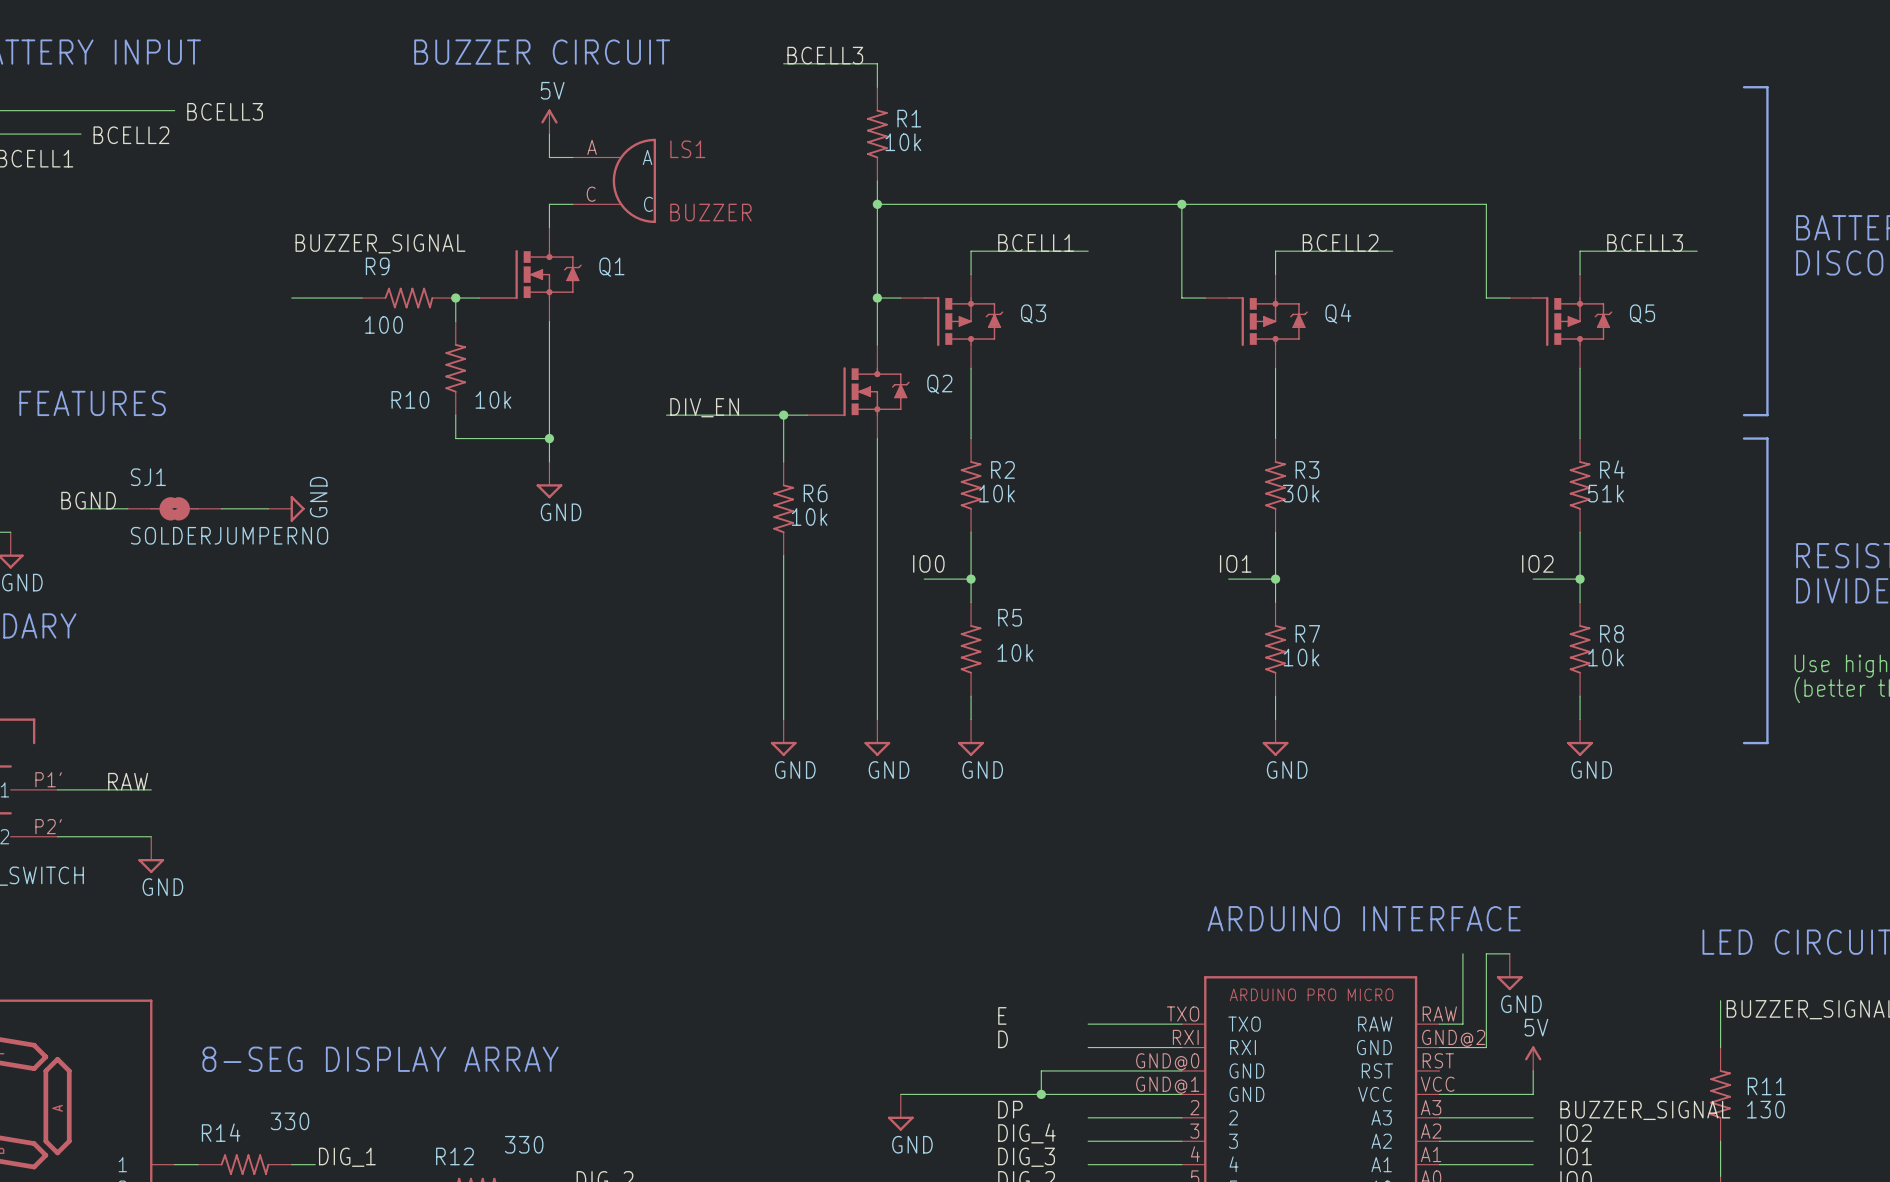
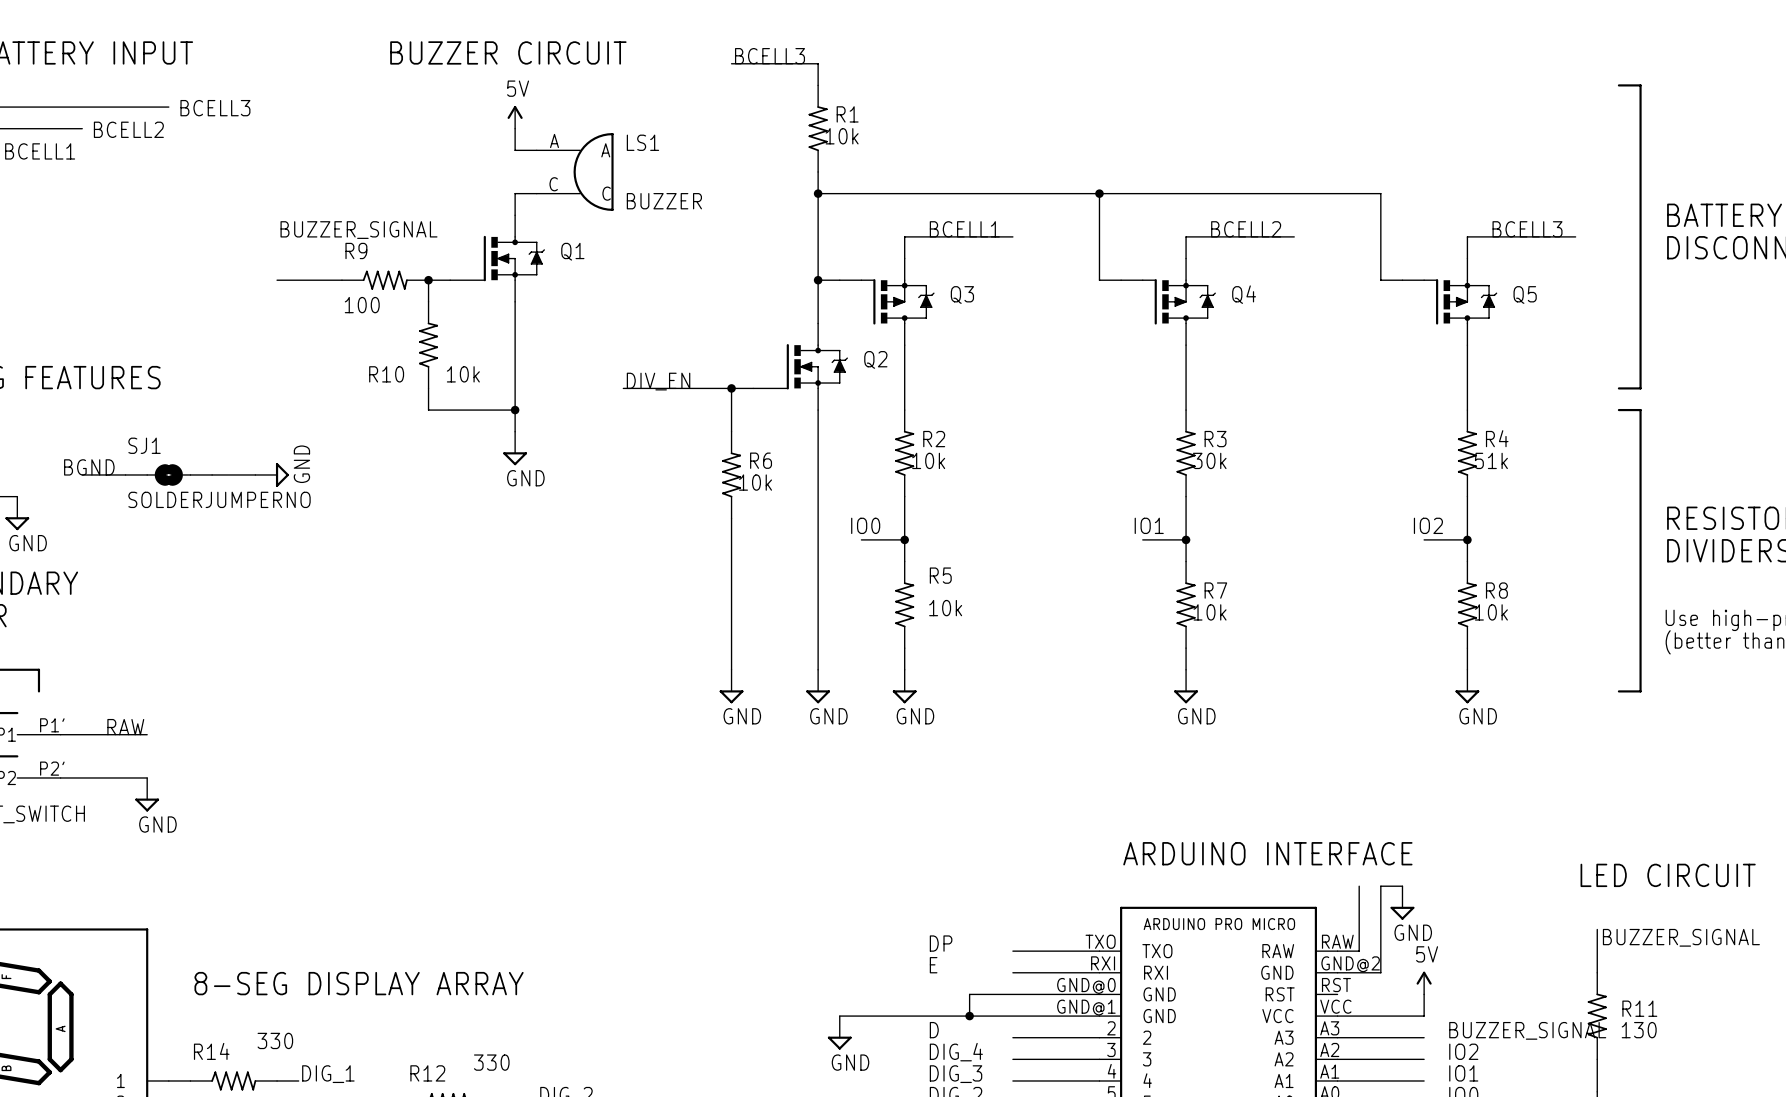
label: E (1002, 1015) -> DP (941, 943)
label: D (1003, 1039) -> E (933, 965)
label: DP (1010, 1109) -> D (934, 1030)

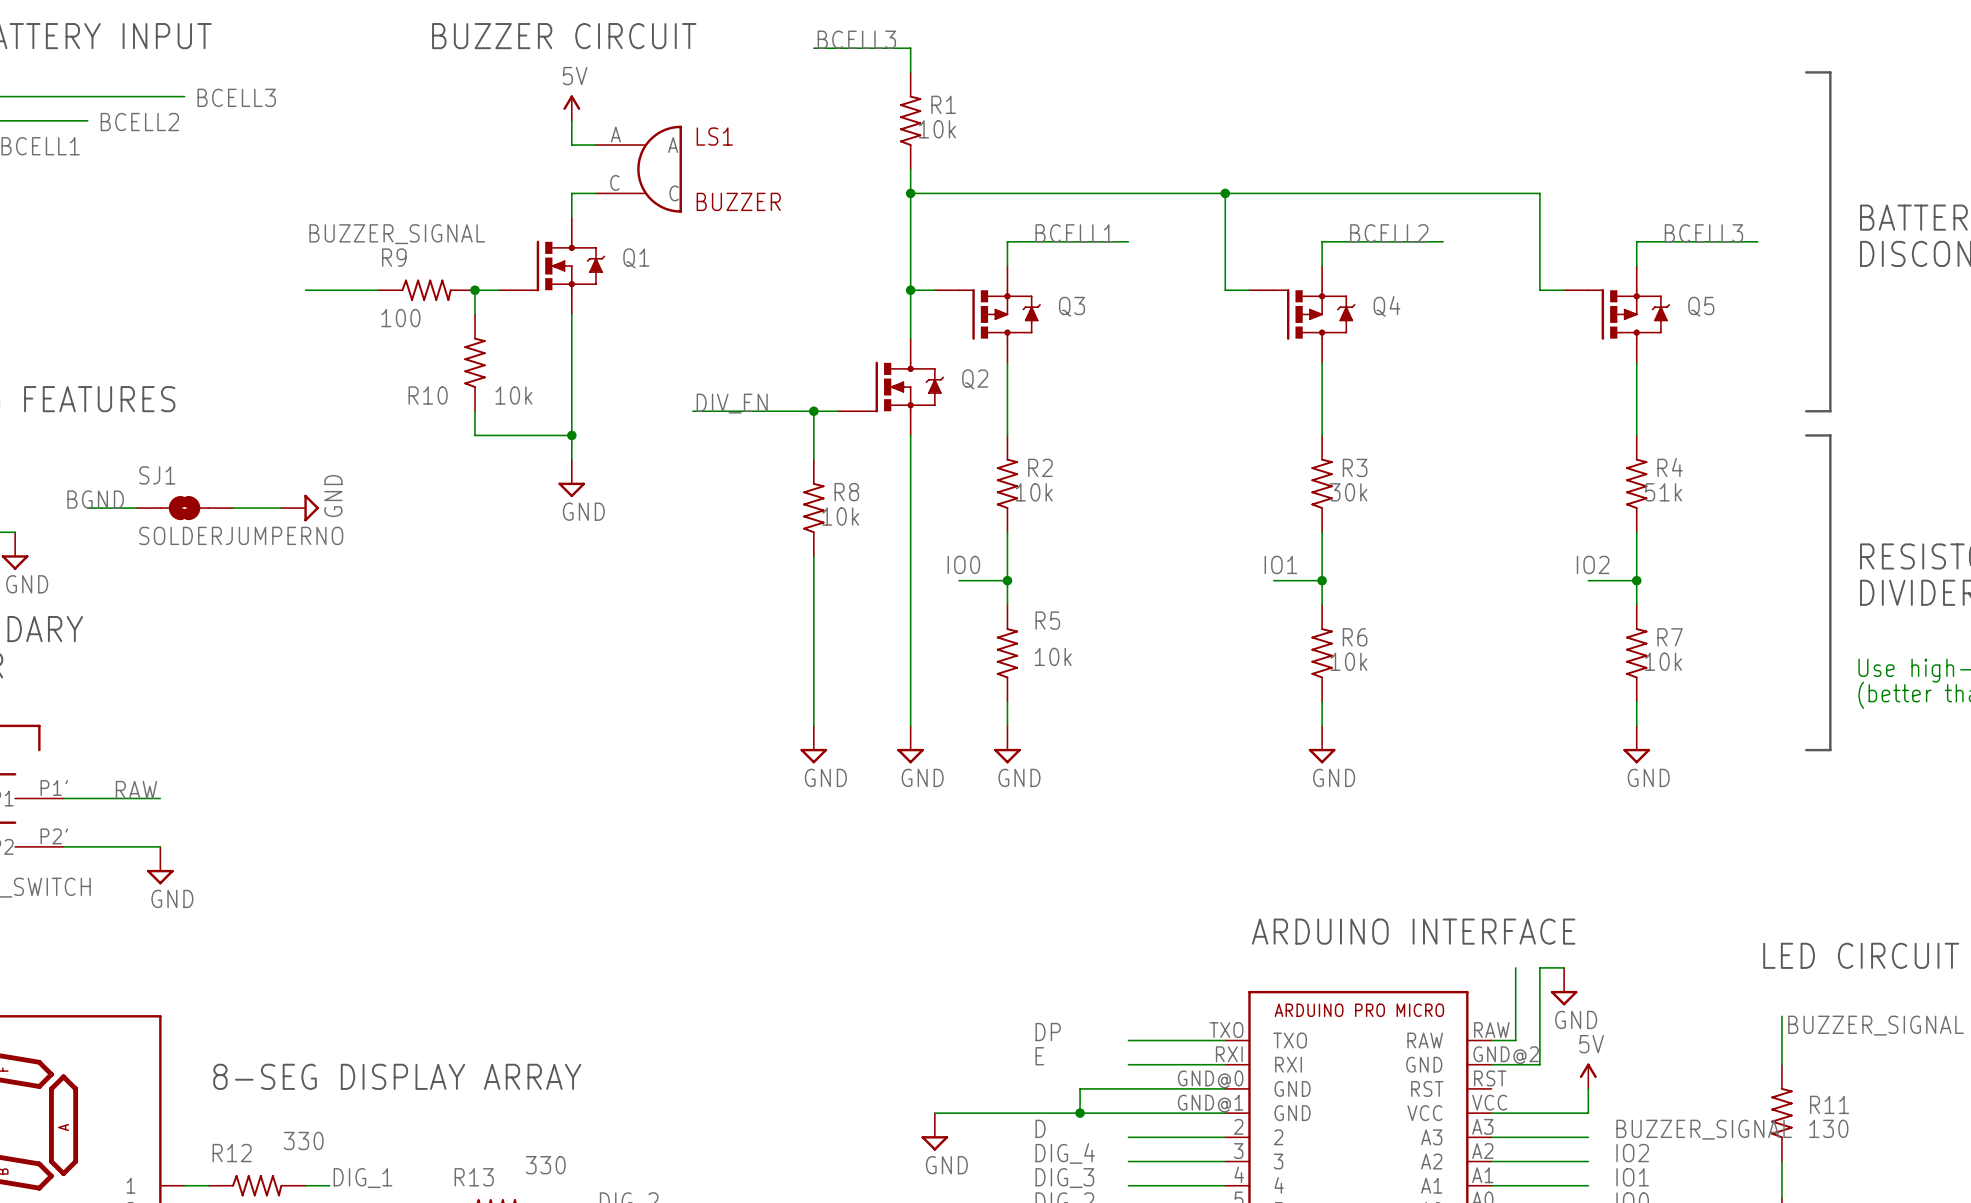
R6 name: R6 (761, 460) -> R8 (846, 492)
R7 name: R7 (1215, 590) -> R6 (1355, 637)
R8 name: R8 (1496, 590) -> R7 (1670, 637)
R14 name: R14 (211, 1051) -> R12 (232, 1153)
R12 name: R12 (427, 1073) -> R13 (474, 1177)

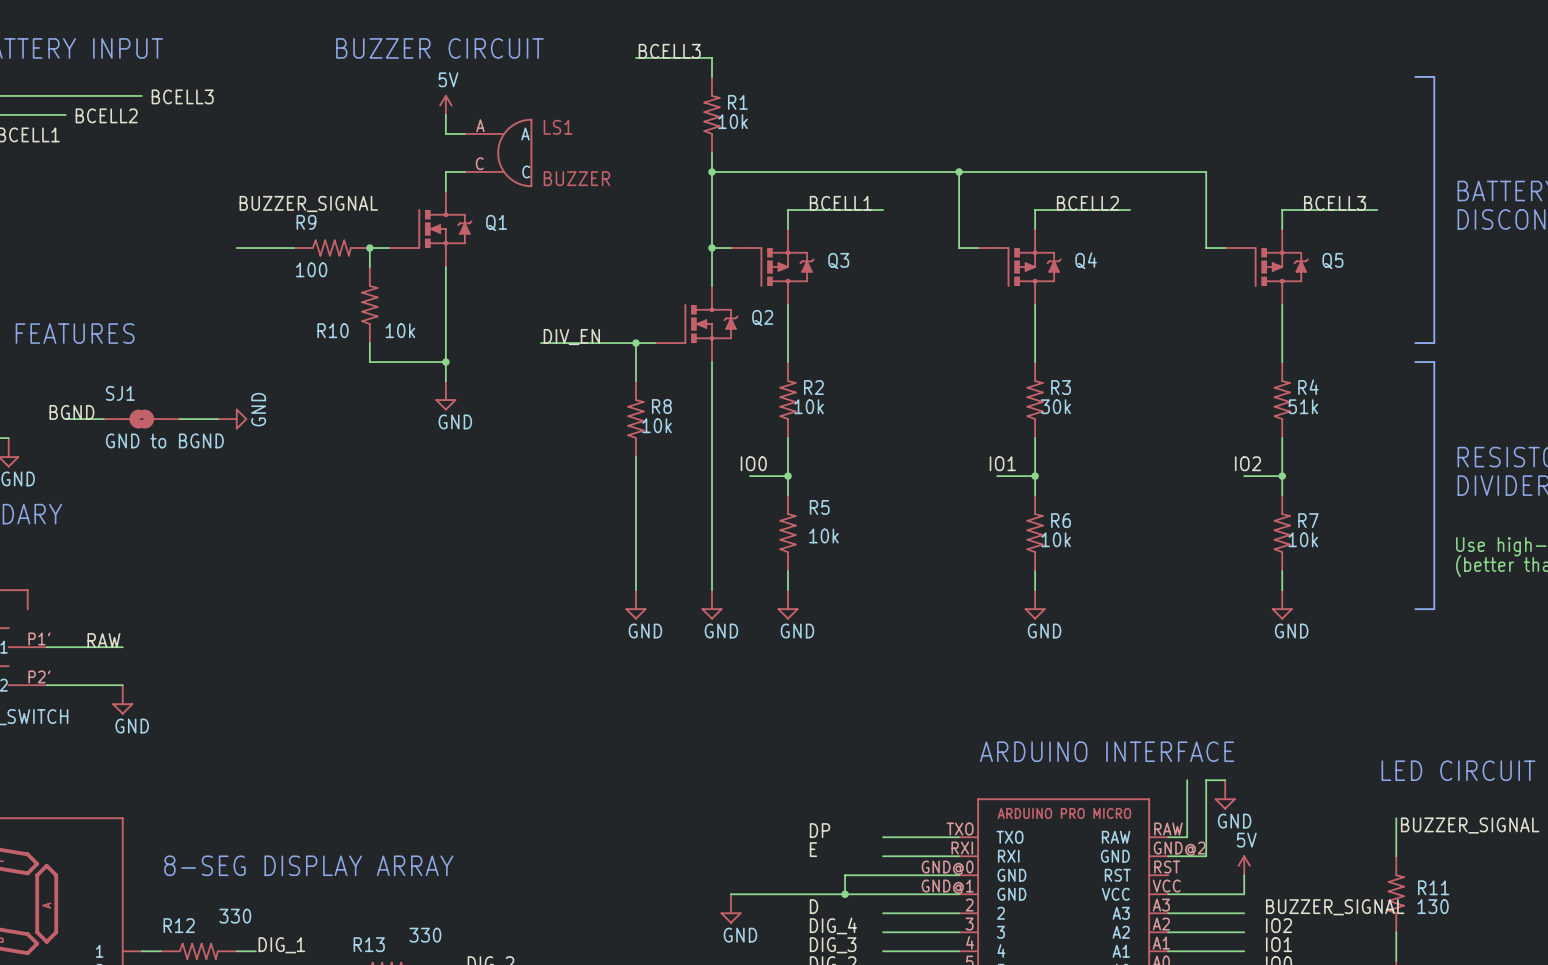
SJ1 value: SOLDERJUMPERNO (241, 535) -> GND to BGND (164, 440)

